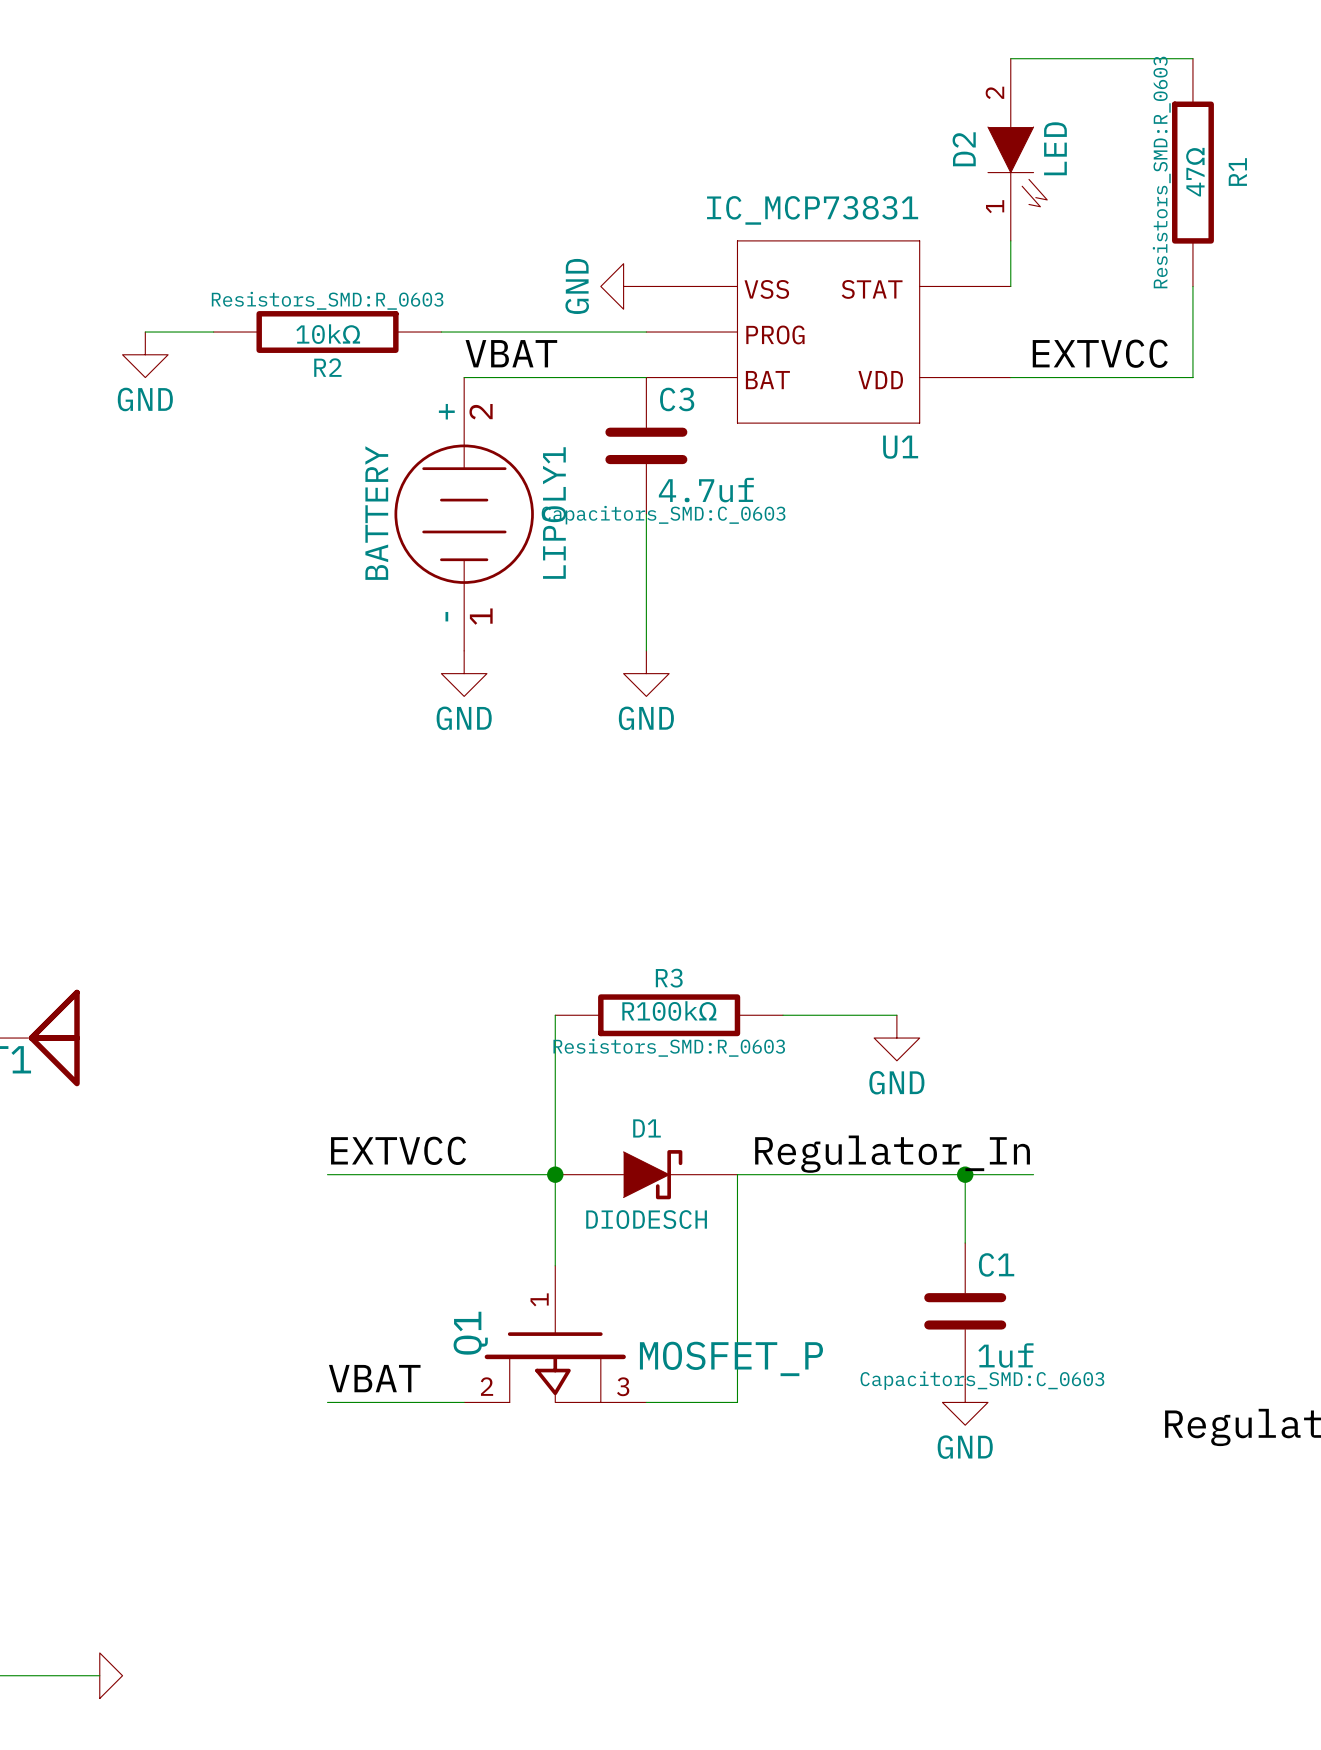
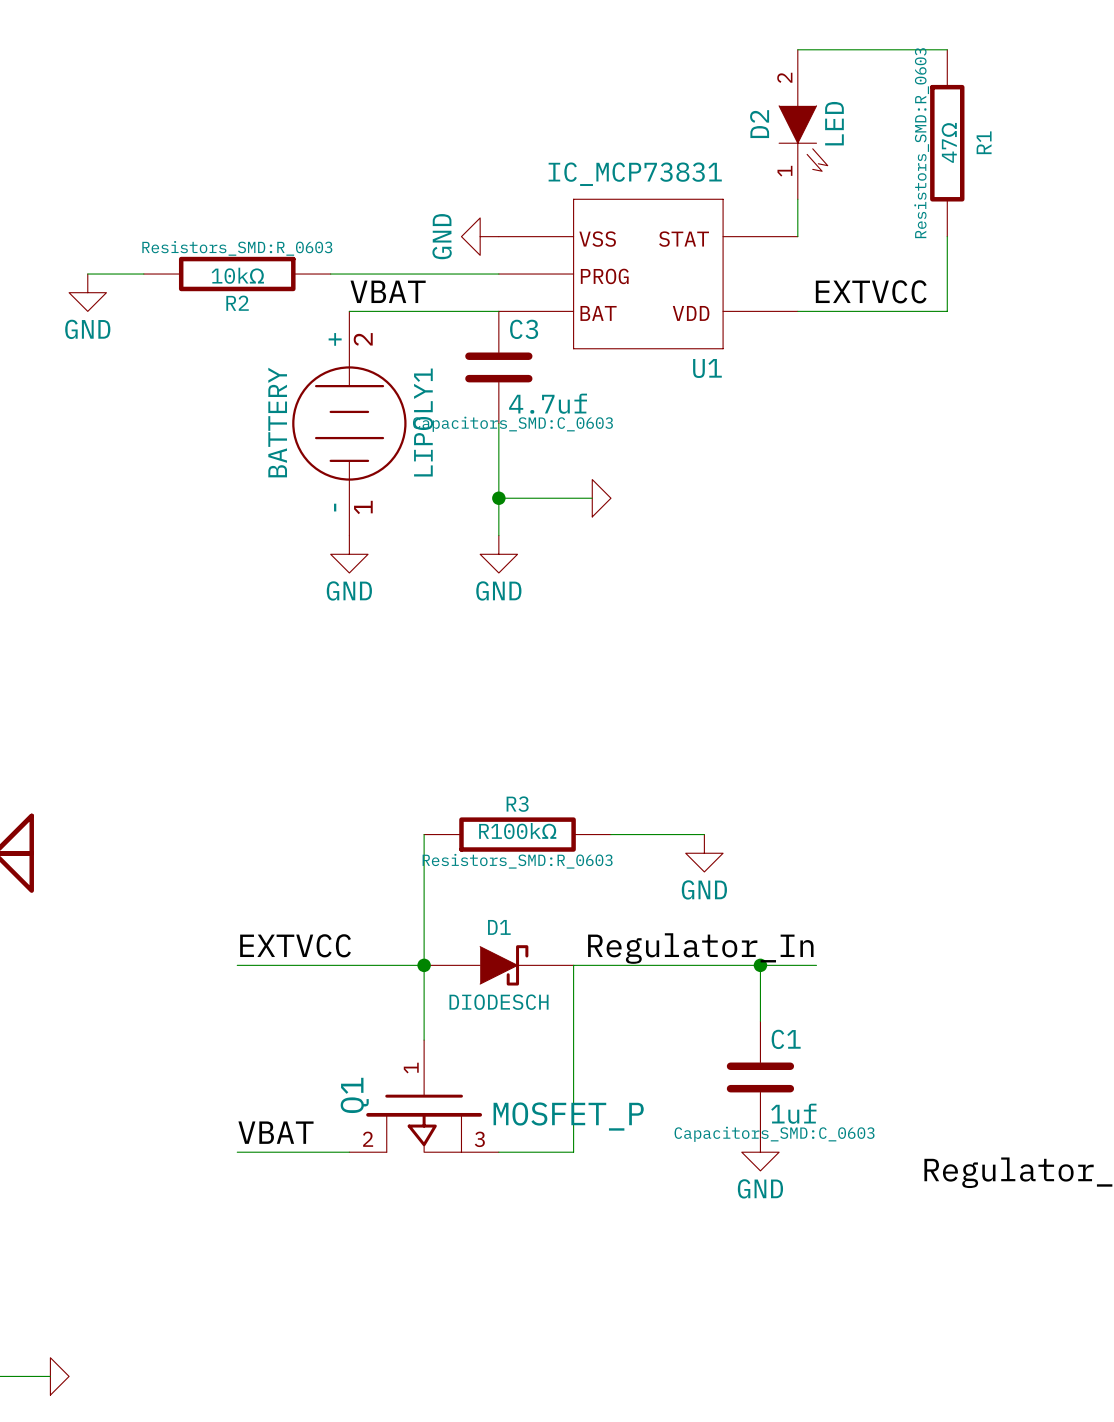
wire: none -> (498, 498) (592, 498)
junction: none -> (498, 498)
power symbol: none -> (601, 498)

